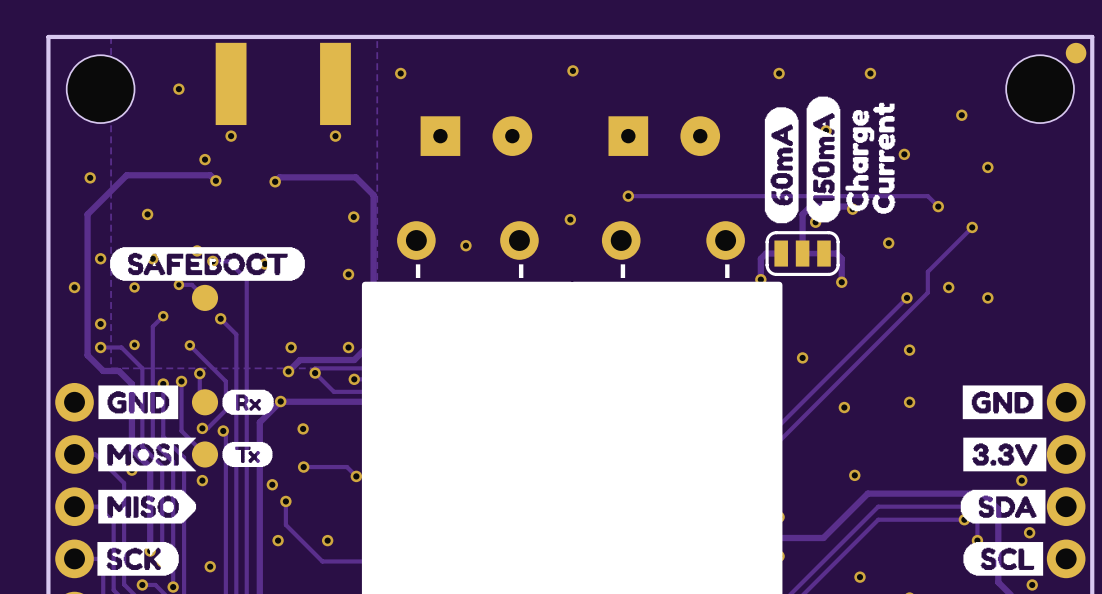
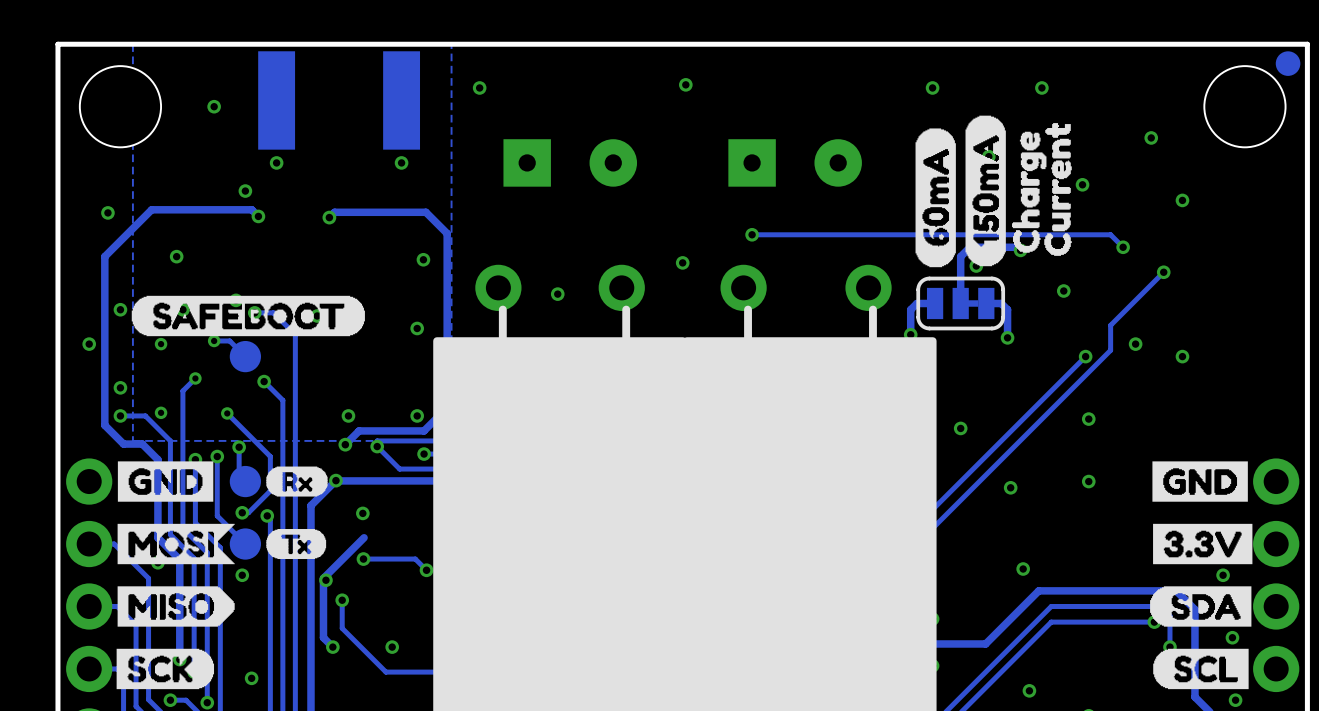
track: none -> (364, 537) (323, 578) (323, 637) (332, 647)

